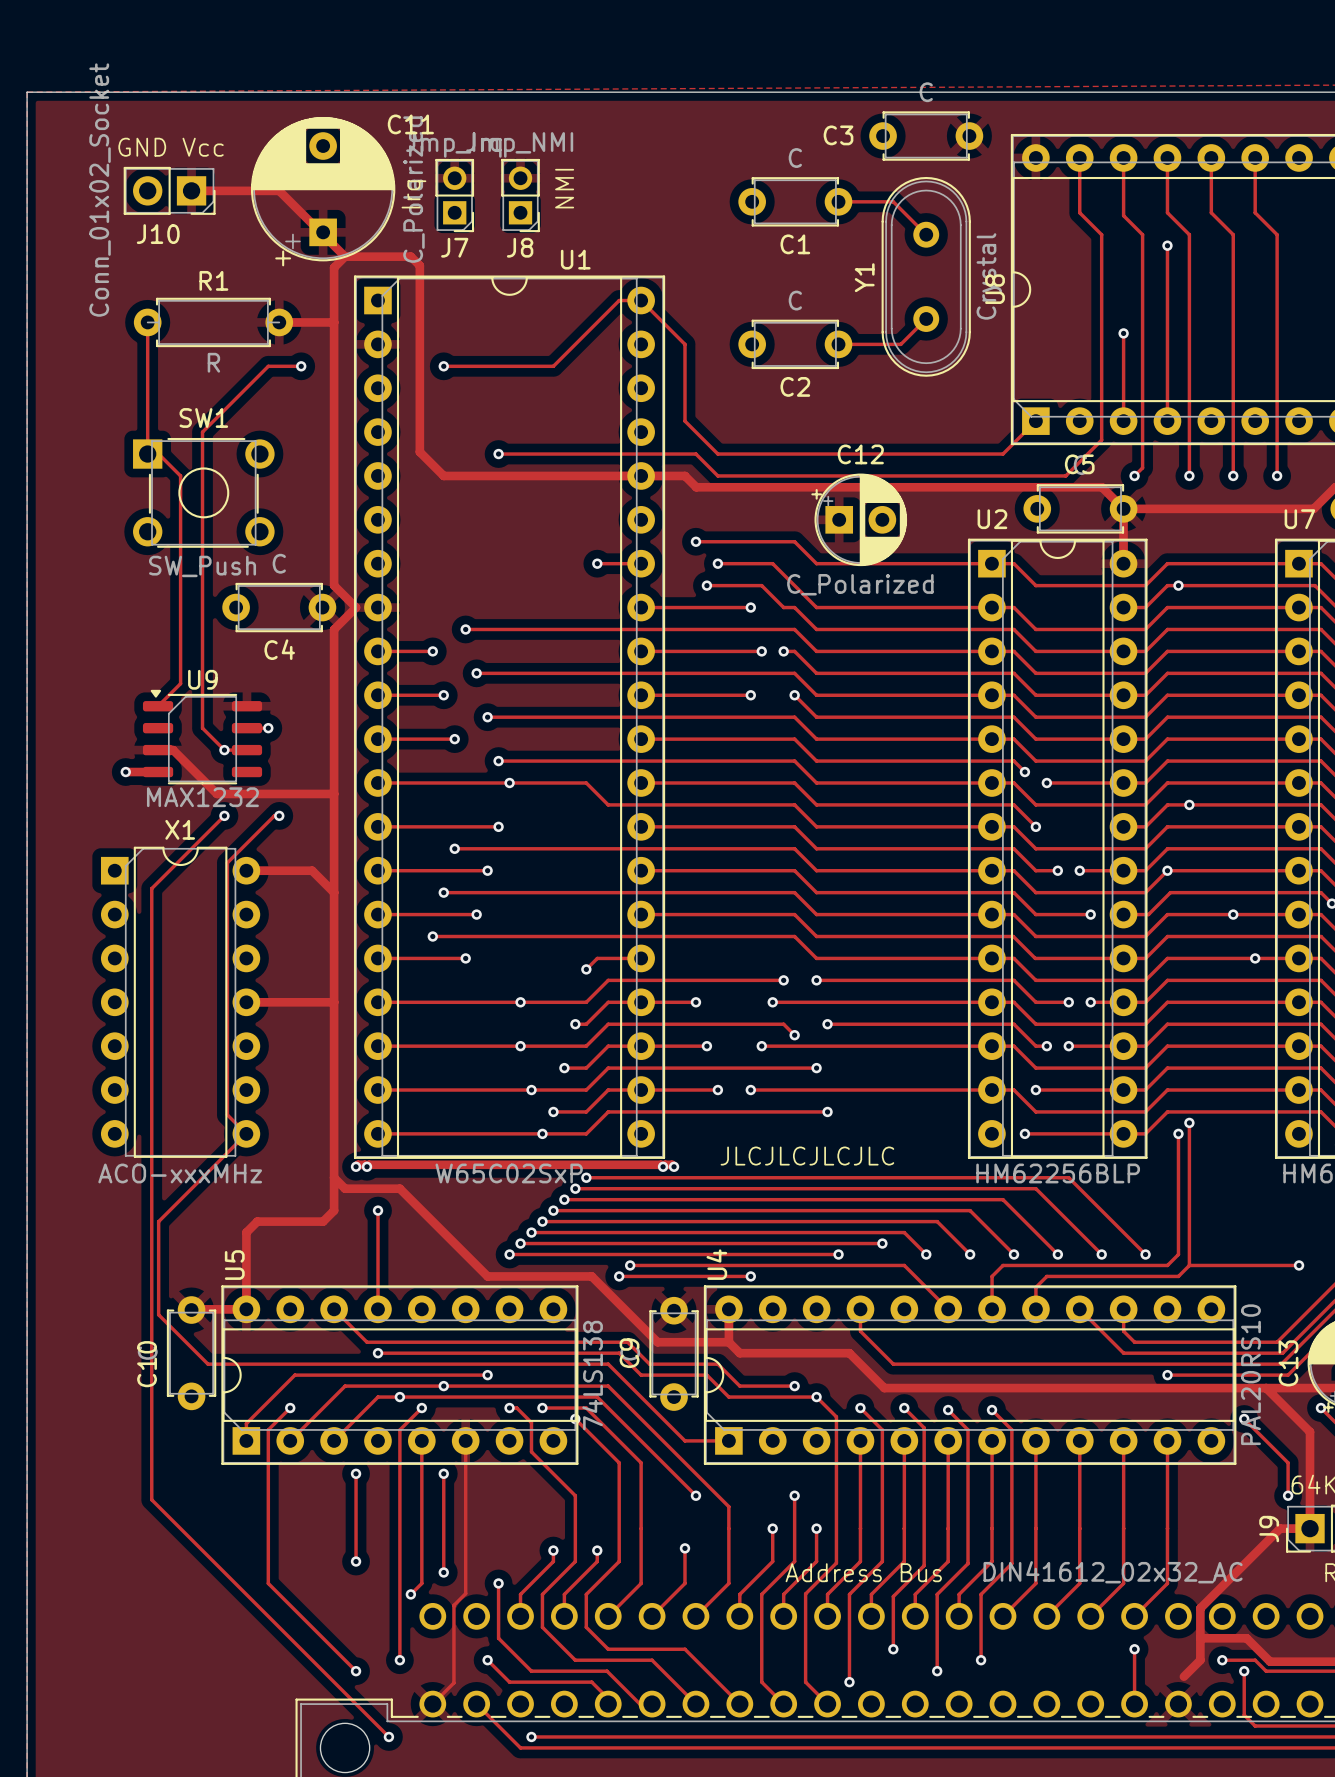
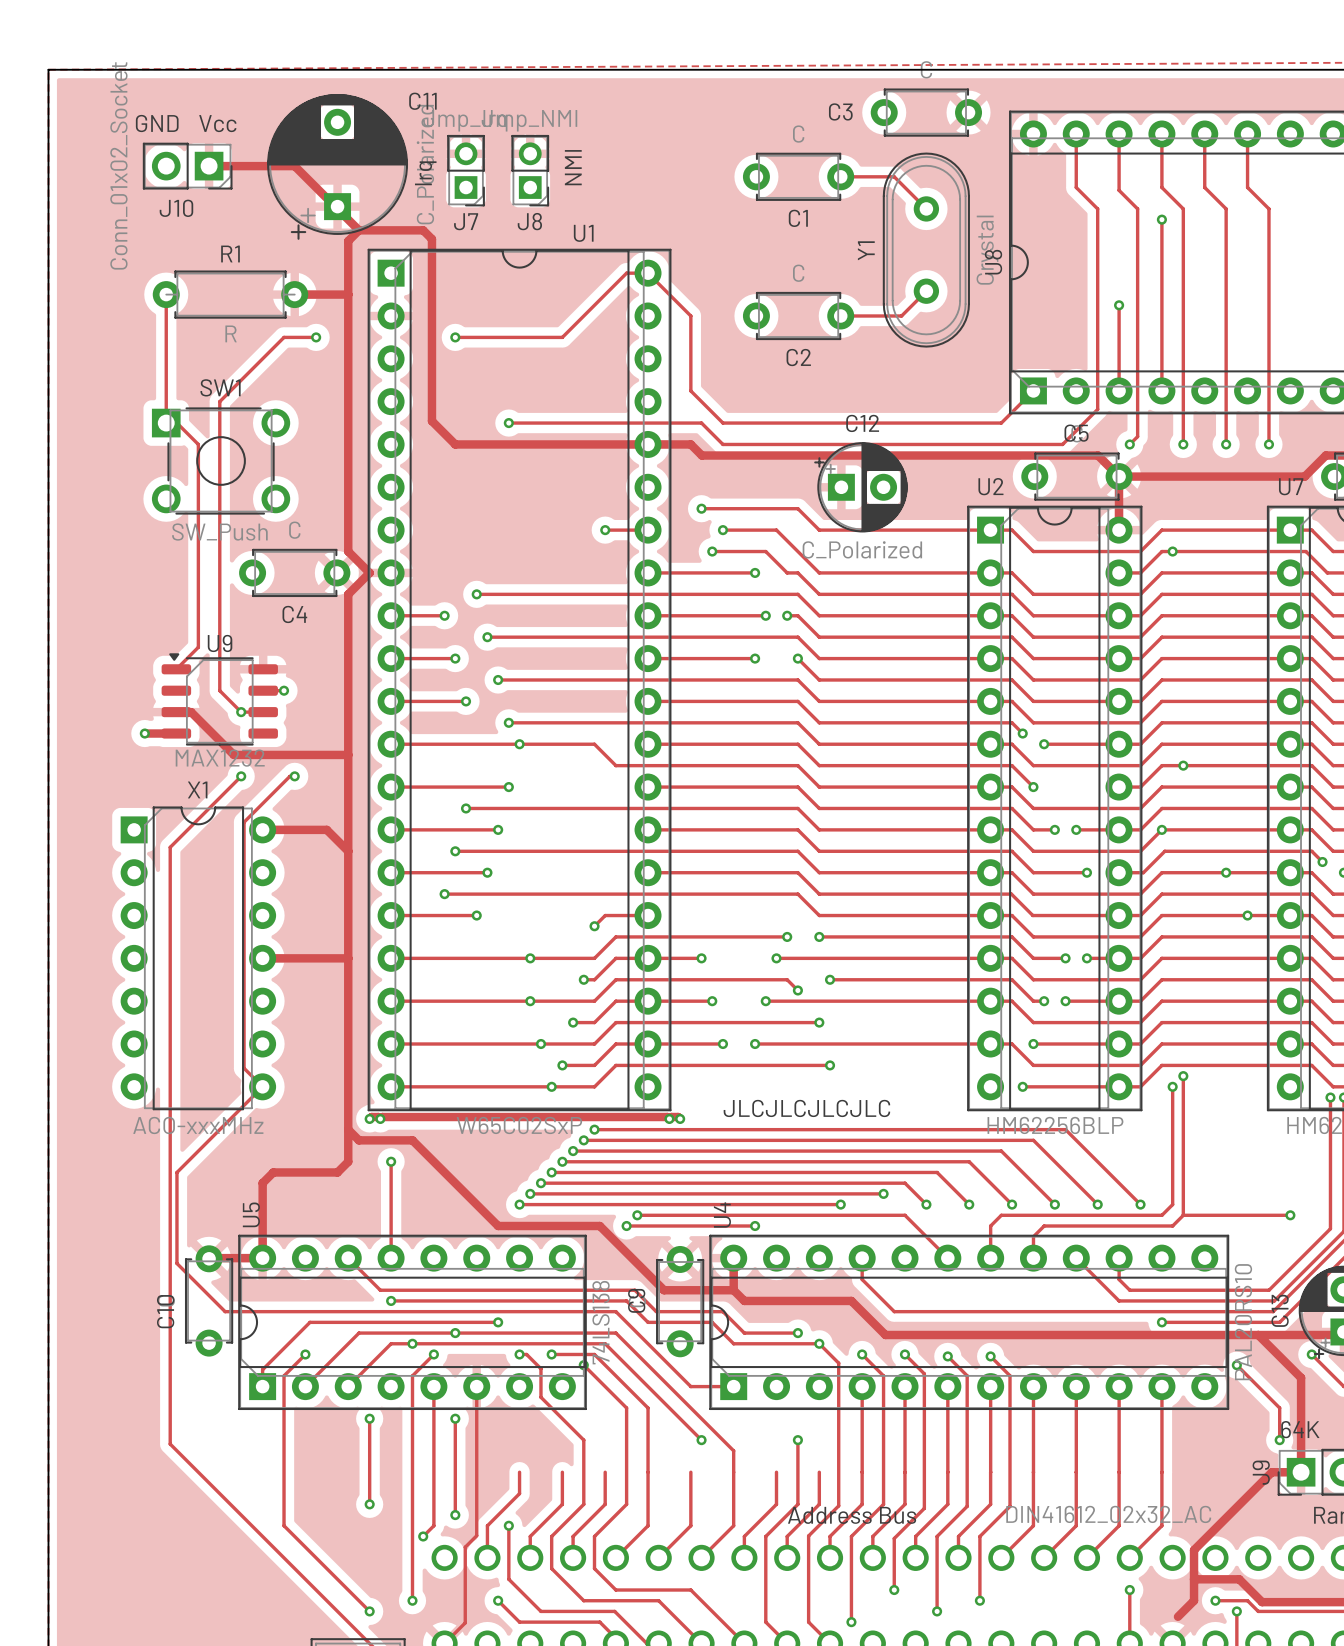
track: none -> (519, 1472) (519, 1493) (487, 1525) (487, 1557)
track: none -> (562, 1472) (562, 1493)
track: none -> (605, 1472) (605, 1493)
track: none -> (690, 1472) (690, 1491)
via: (772, 1528) -> none
via: (816, 1528) -> none
via: (684, 1548) -> none
via: (553, 1550) -> none
via: (597, 1550) -> none

